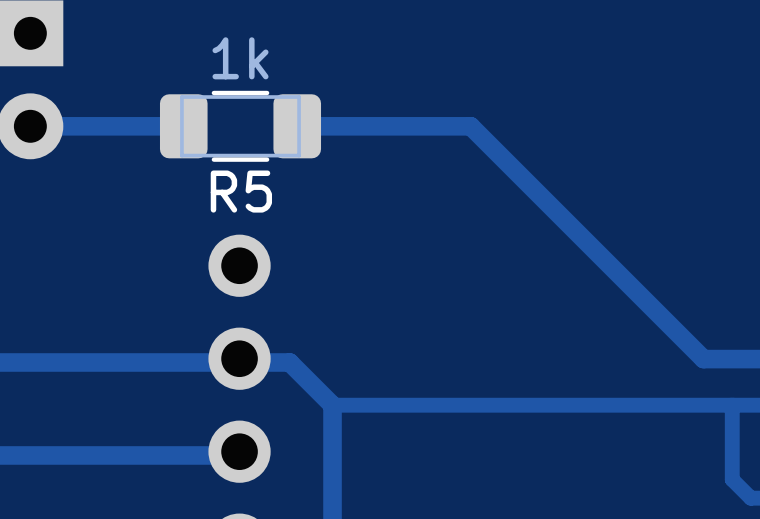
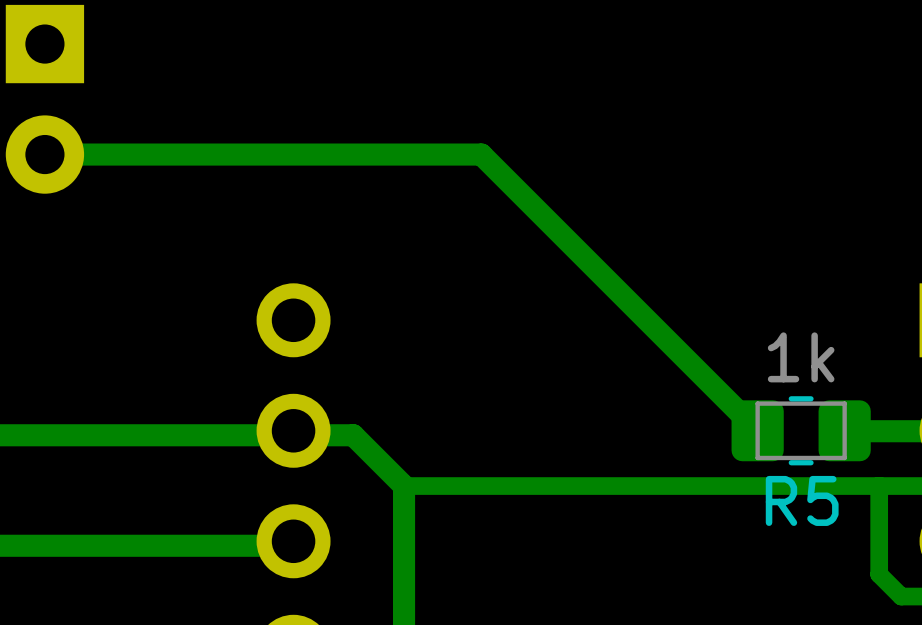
R5 footprint: [159, 90, 322, 162] -> [731, 396, 871, 466]
track: none -> (362, 154) (227, 154)
track: (397, 126) (470, 126) (703, 358) -> (481, 154) (757, 430)

